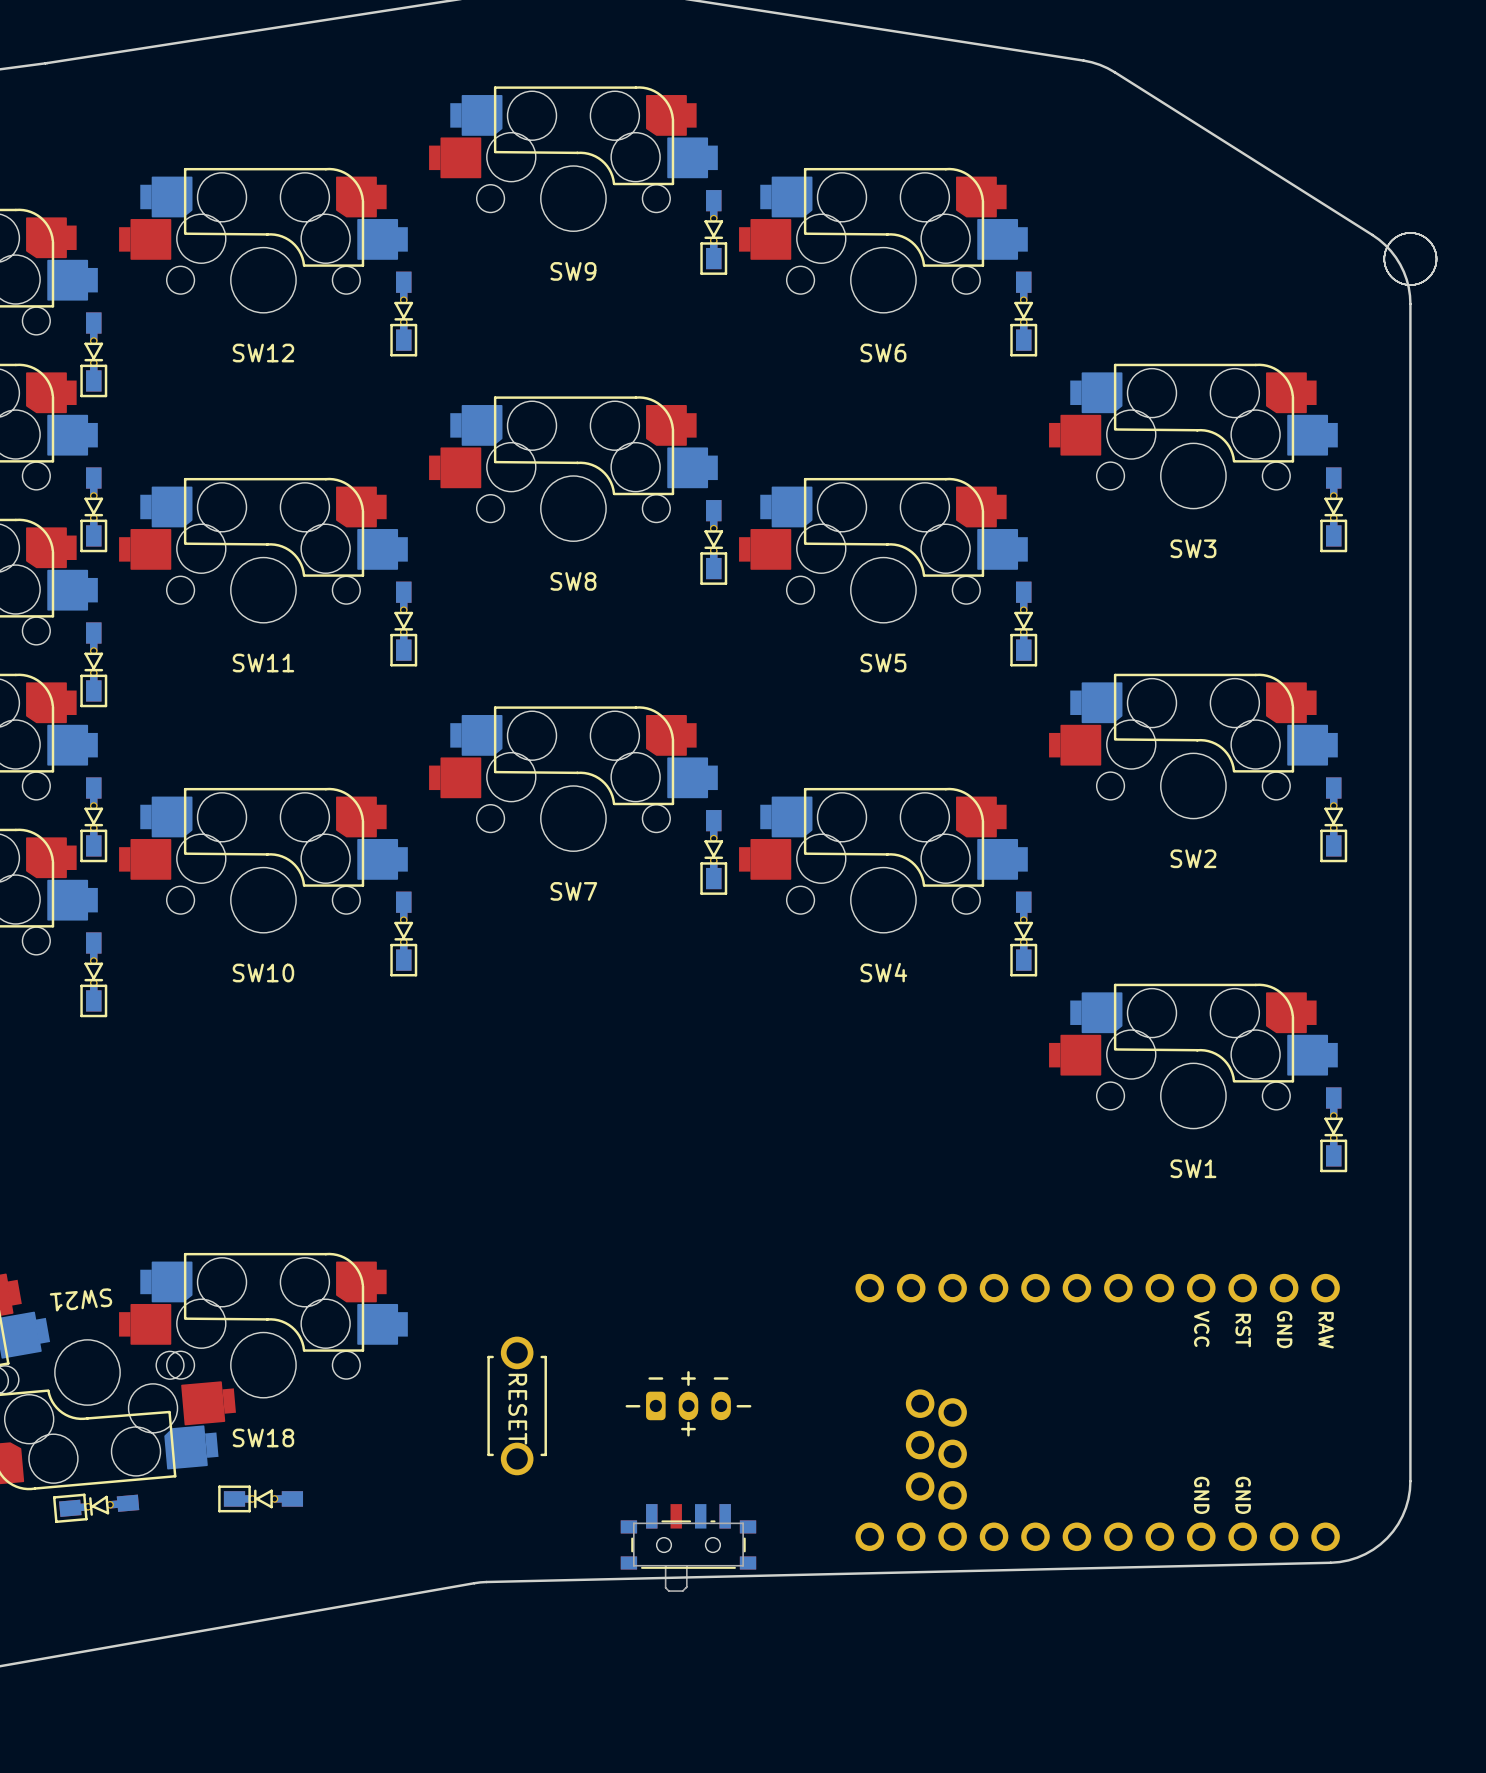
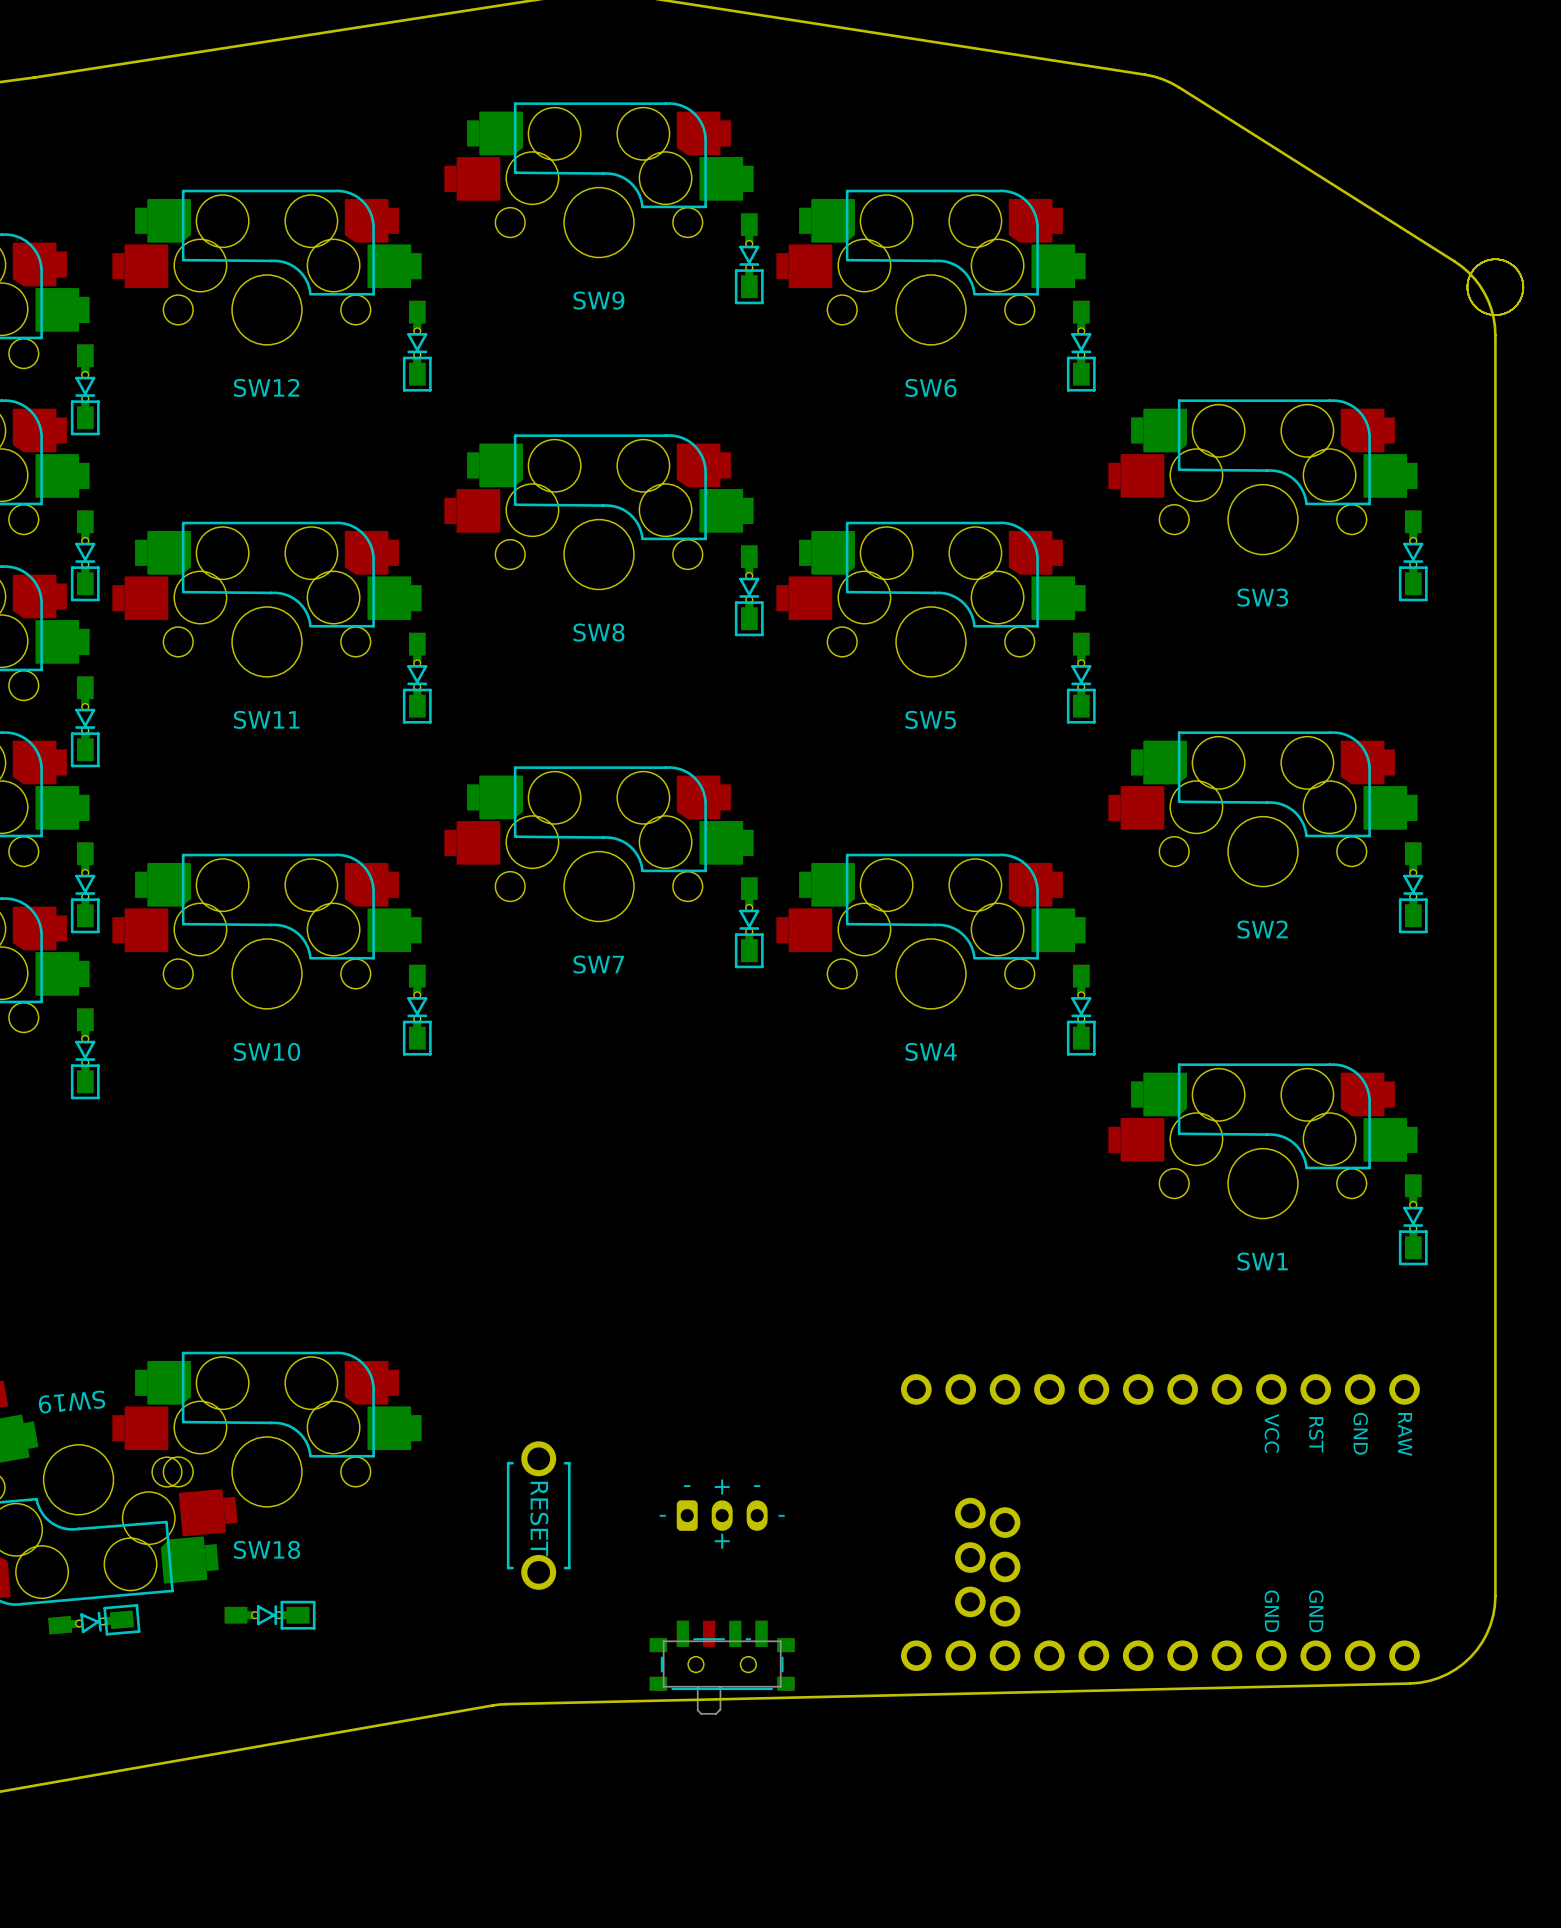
SW21 name: SW21 (81, 1299) -> SW19 (71, 1402)
part rotation: 0° (260, 1498) -> 180° (270, 1615)
part rotation: 0° (96, 1508) -> 180° (94, 1619)

